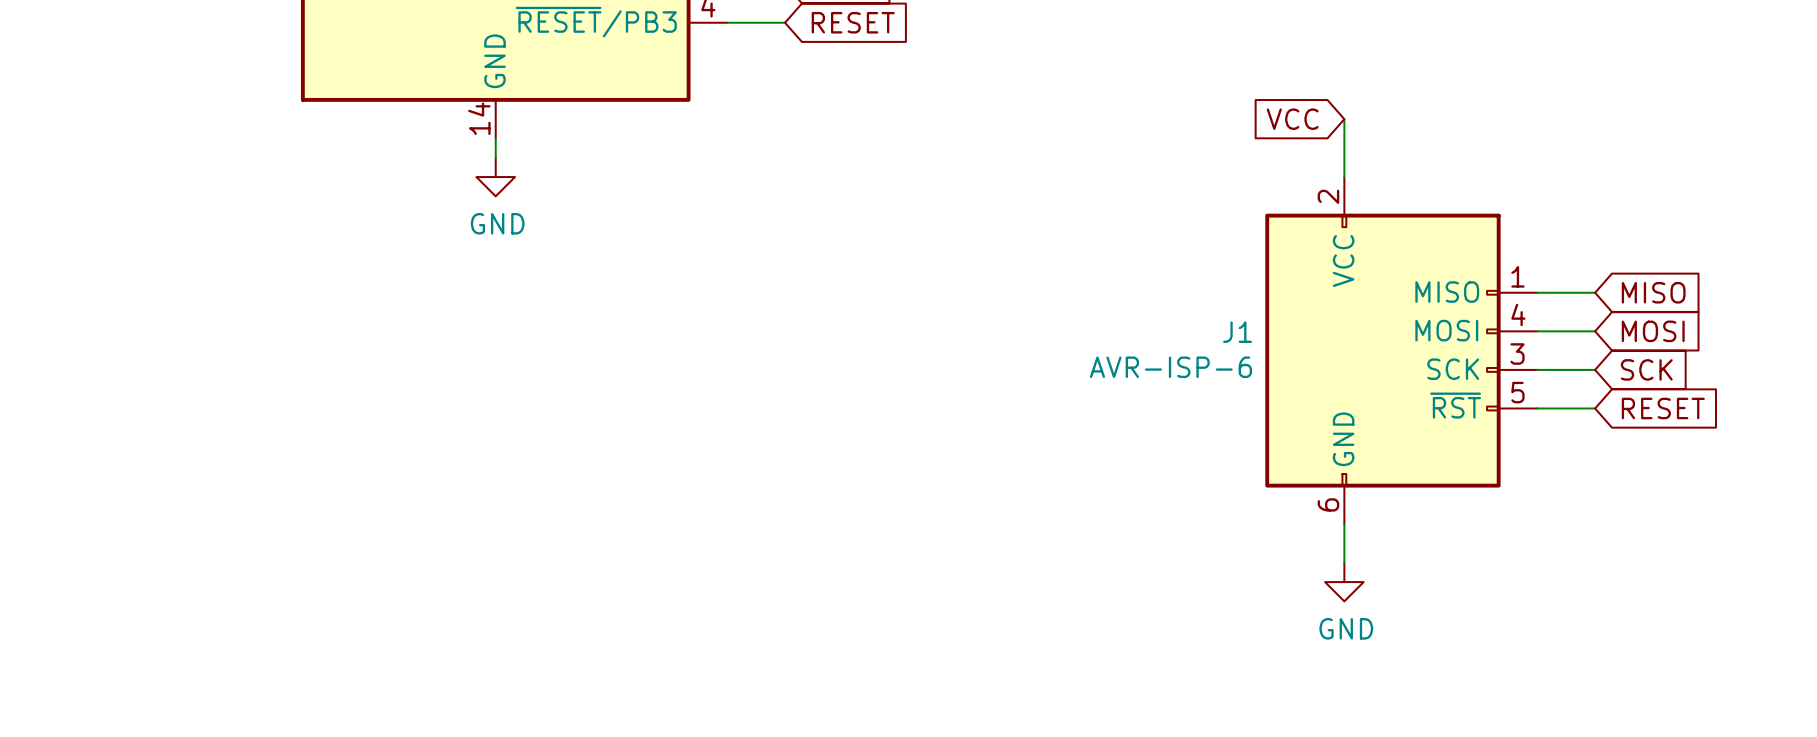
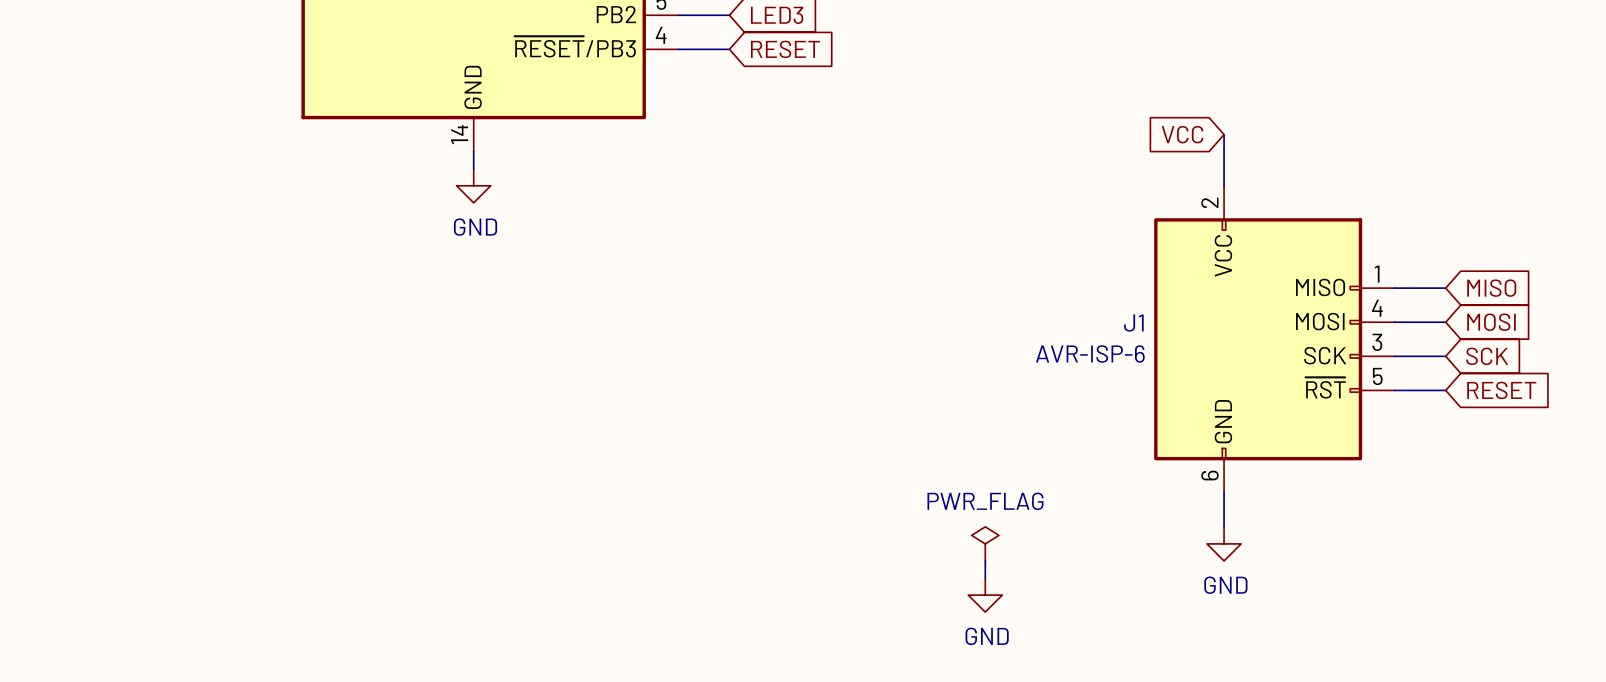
power symbol: none -> PWR_FLAG (985, 543)
wire: none -> (985, 560) (985, 578)
power symbol: none -> GND (985, 595)

